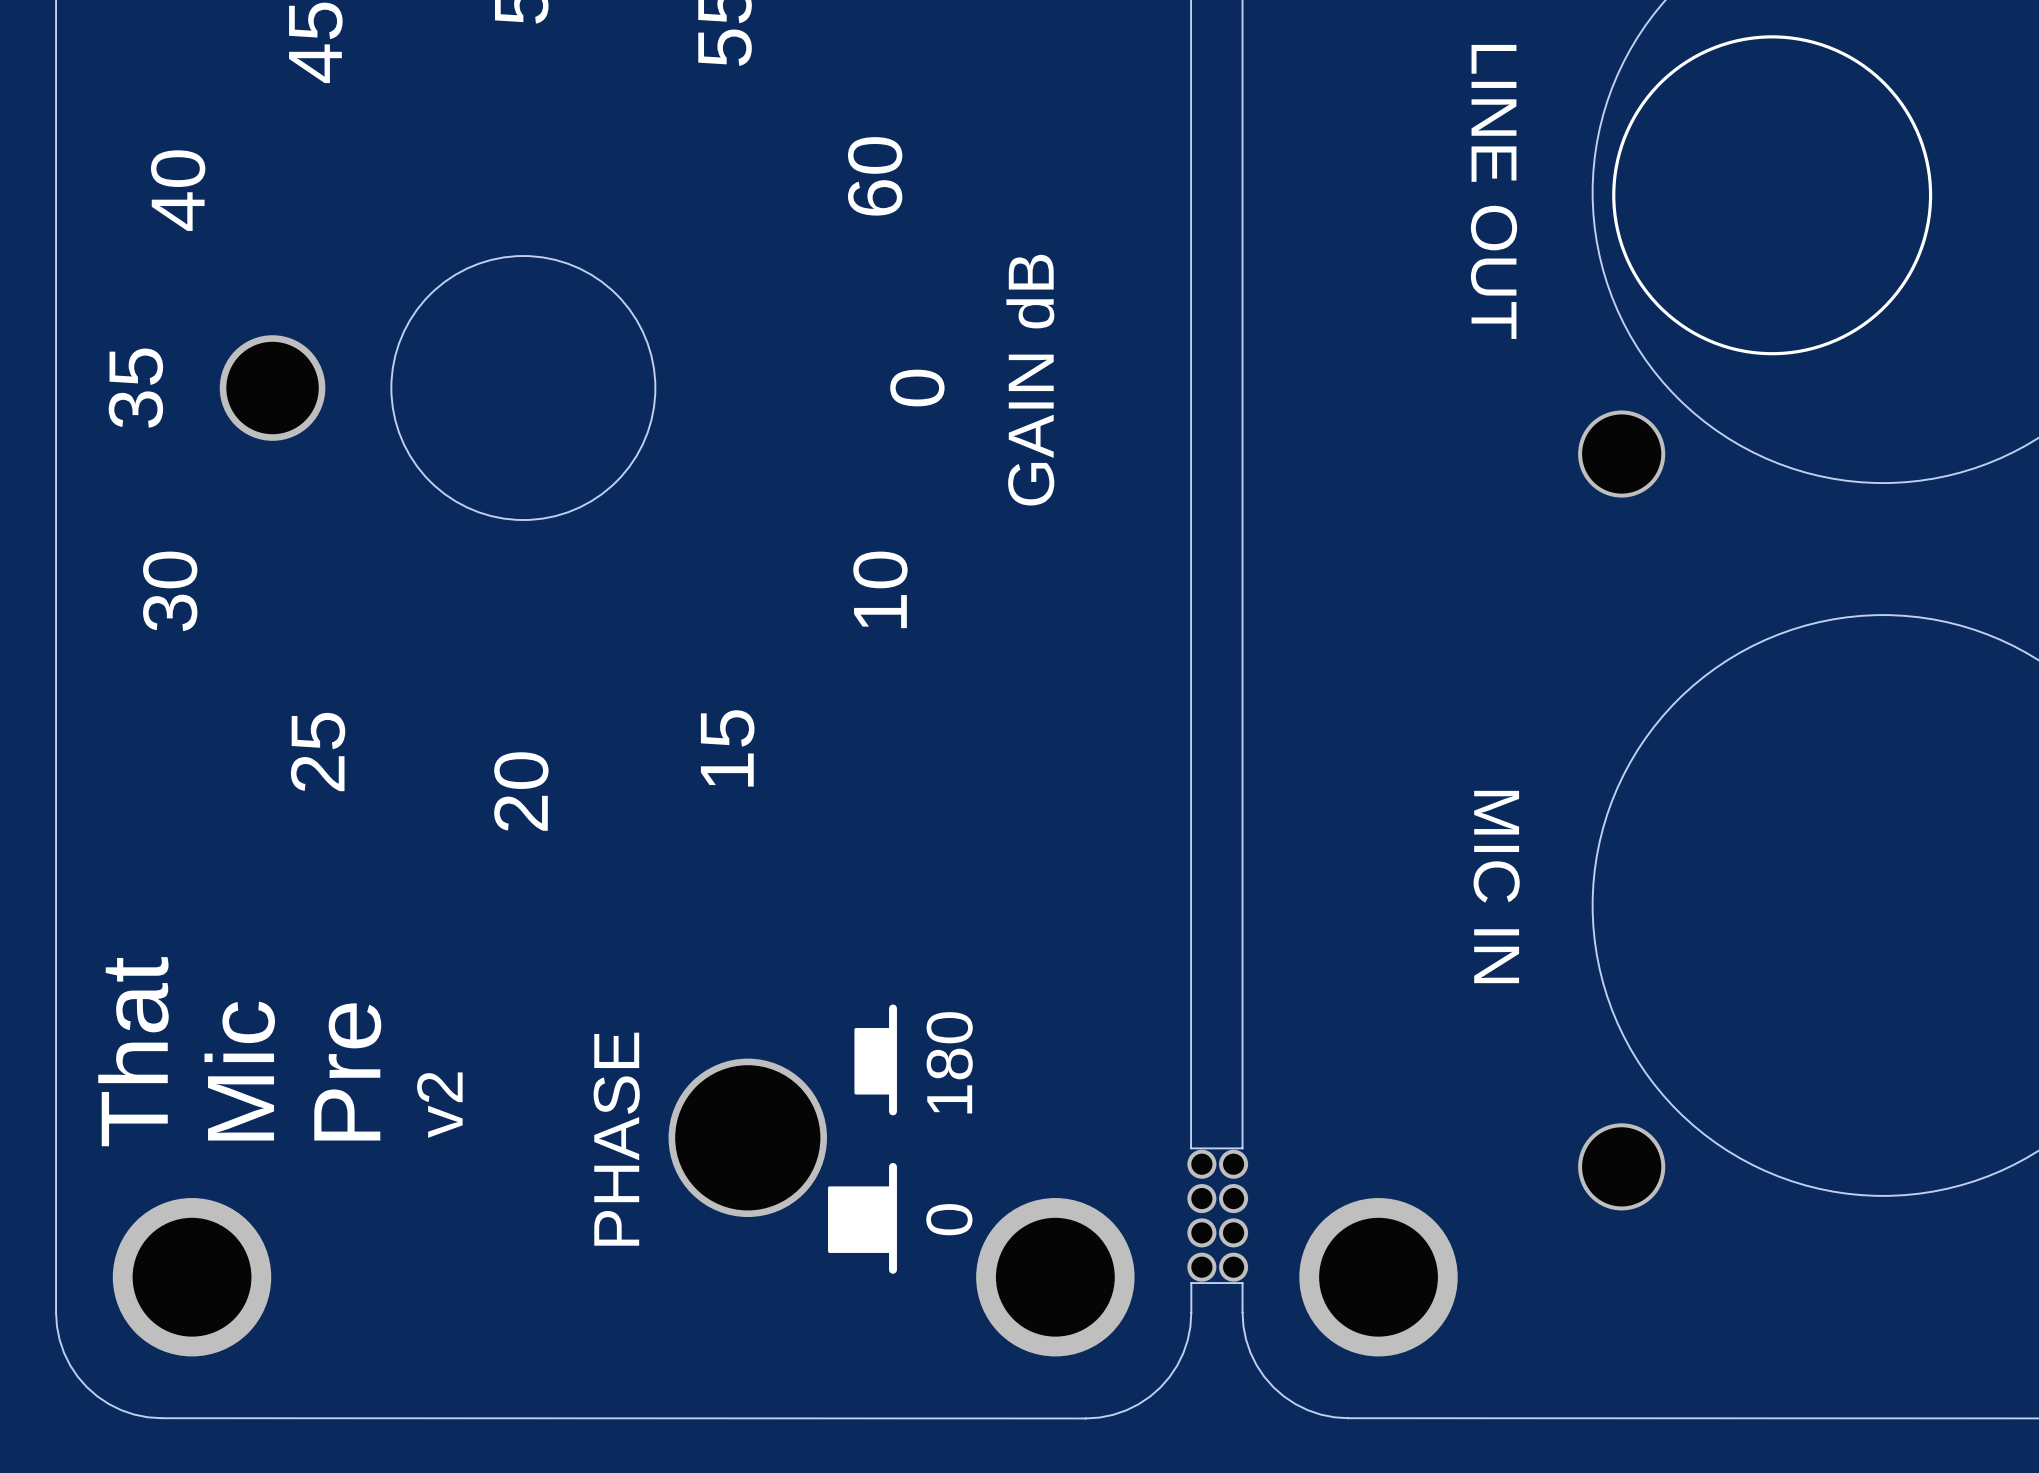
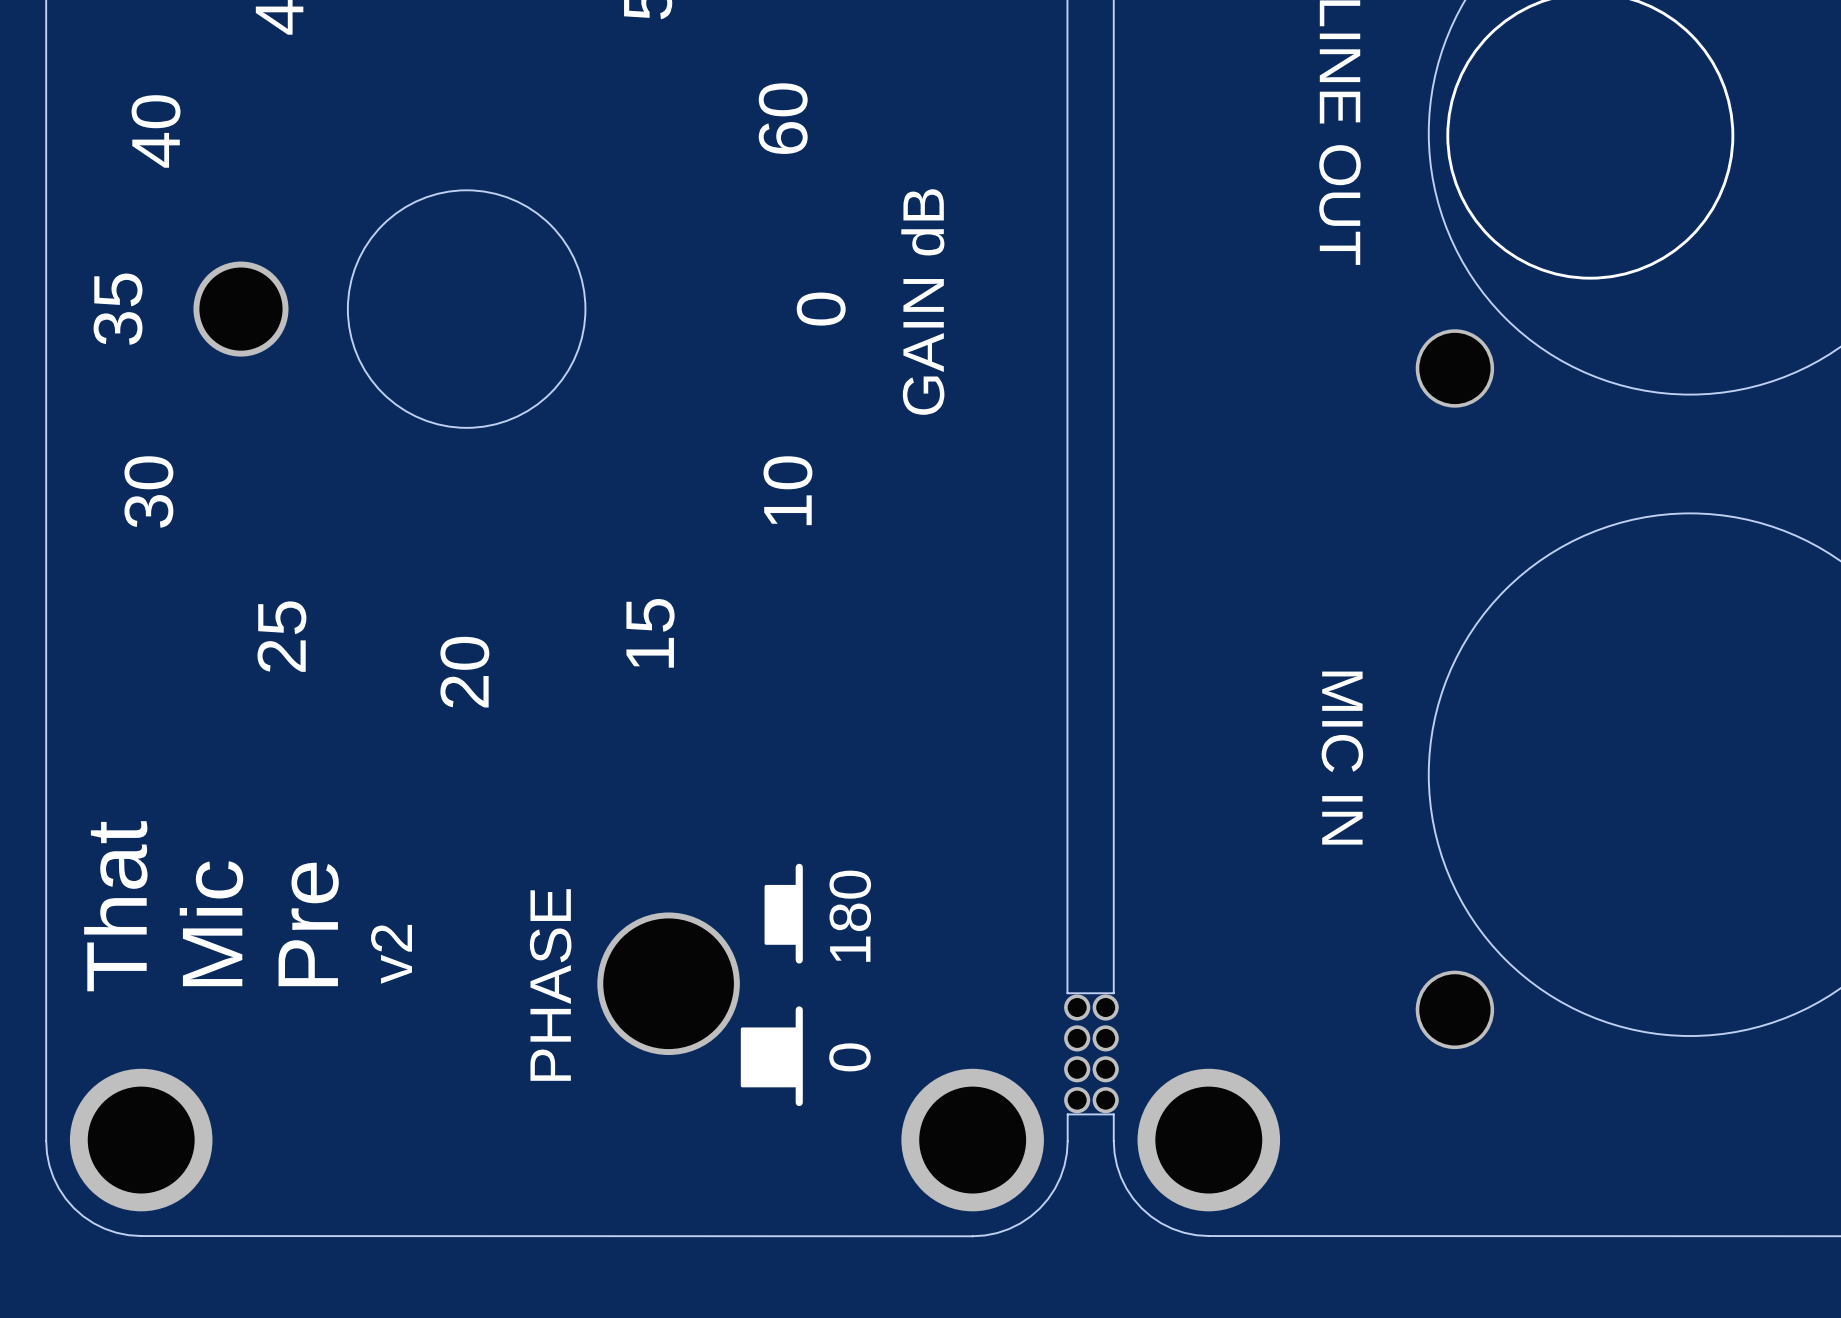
via position: (192, 1277) -> (141, 1140)
via position: (1055, 1277) -> (972, 1140)
via position: (1378, 1277) -> (1208, 1140)

